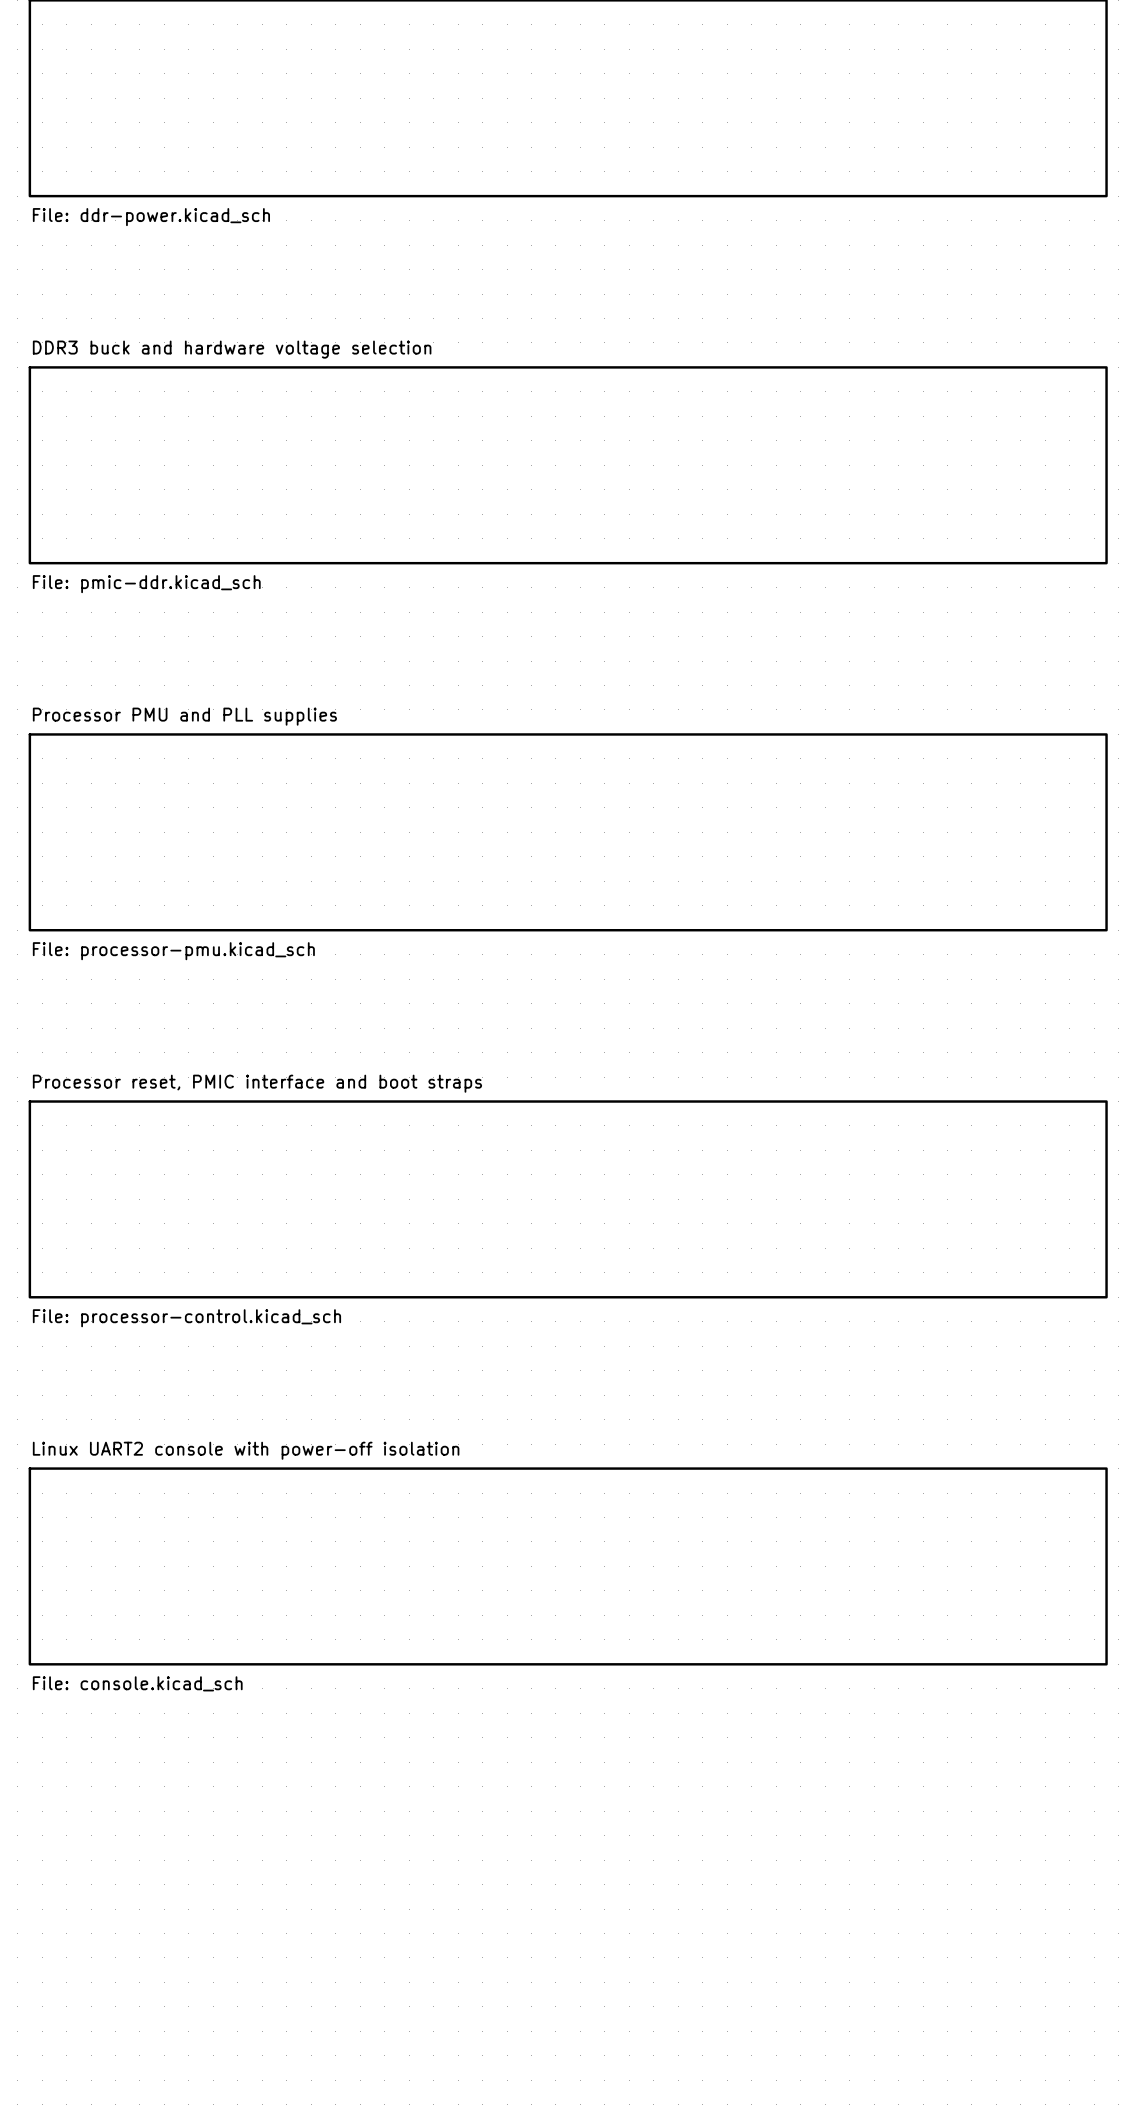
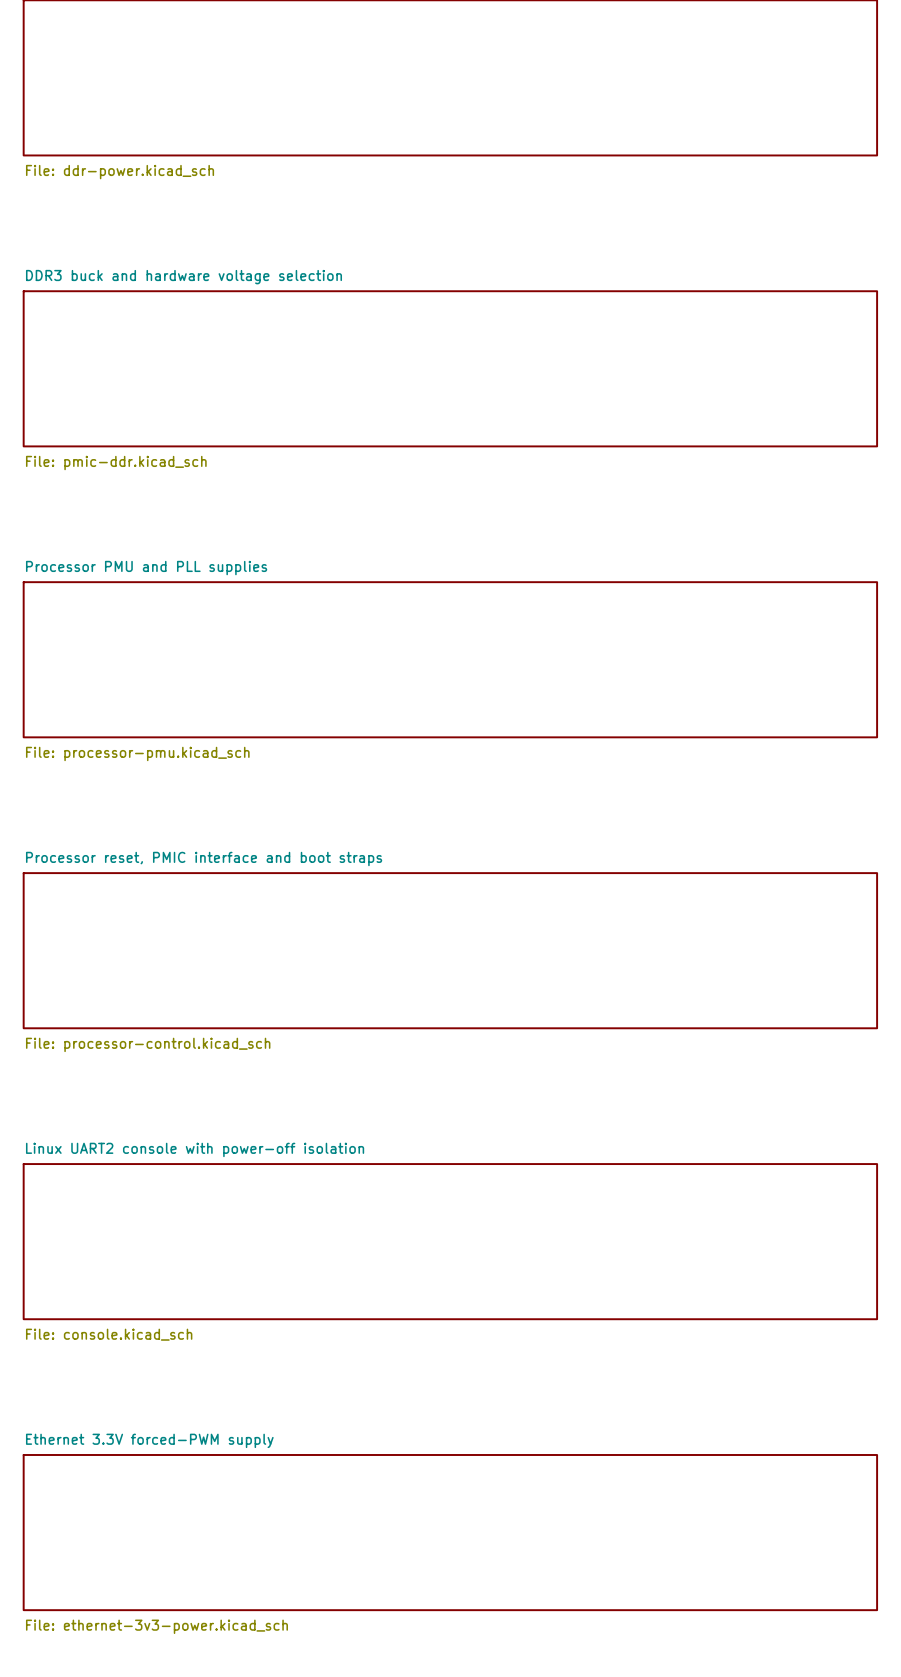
sheet Ethernet 3.3V forced-PWM supply: none -> File: ethernet-3v3-power.kicad_sch (450, 1532)

